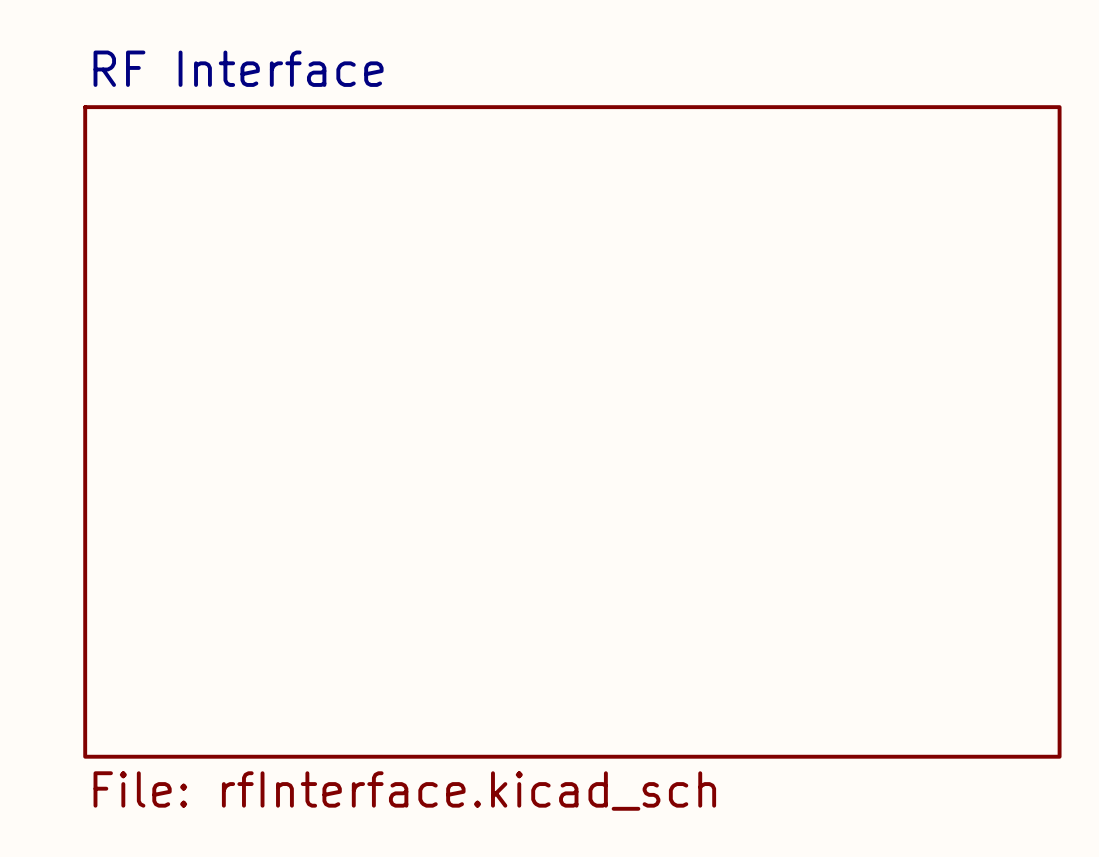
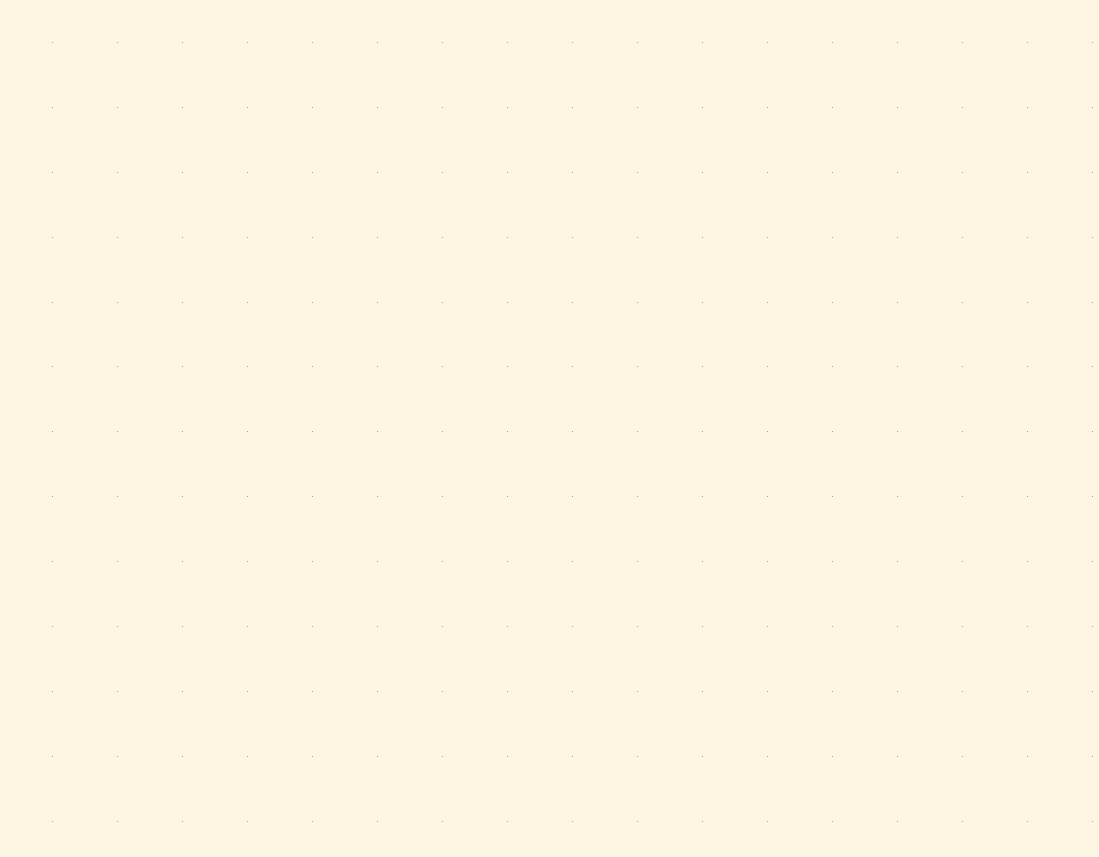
sheet RF Interface: File: rfInterface.kicad_sch (572, 431) -> none

